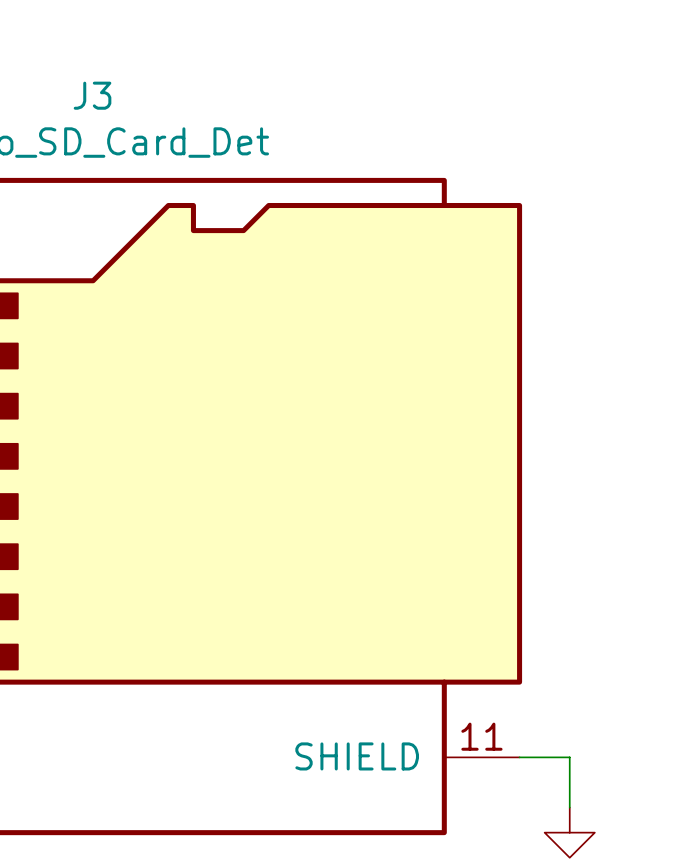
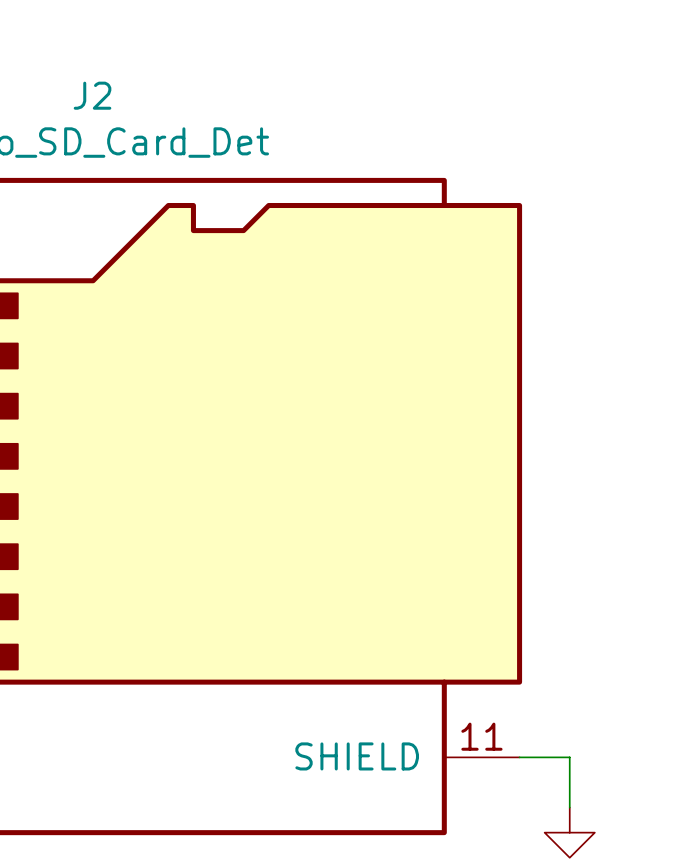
J3 name: J3 (92, 95) -> J2 (92, 95)

